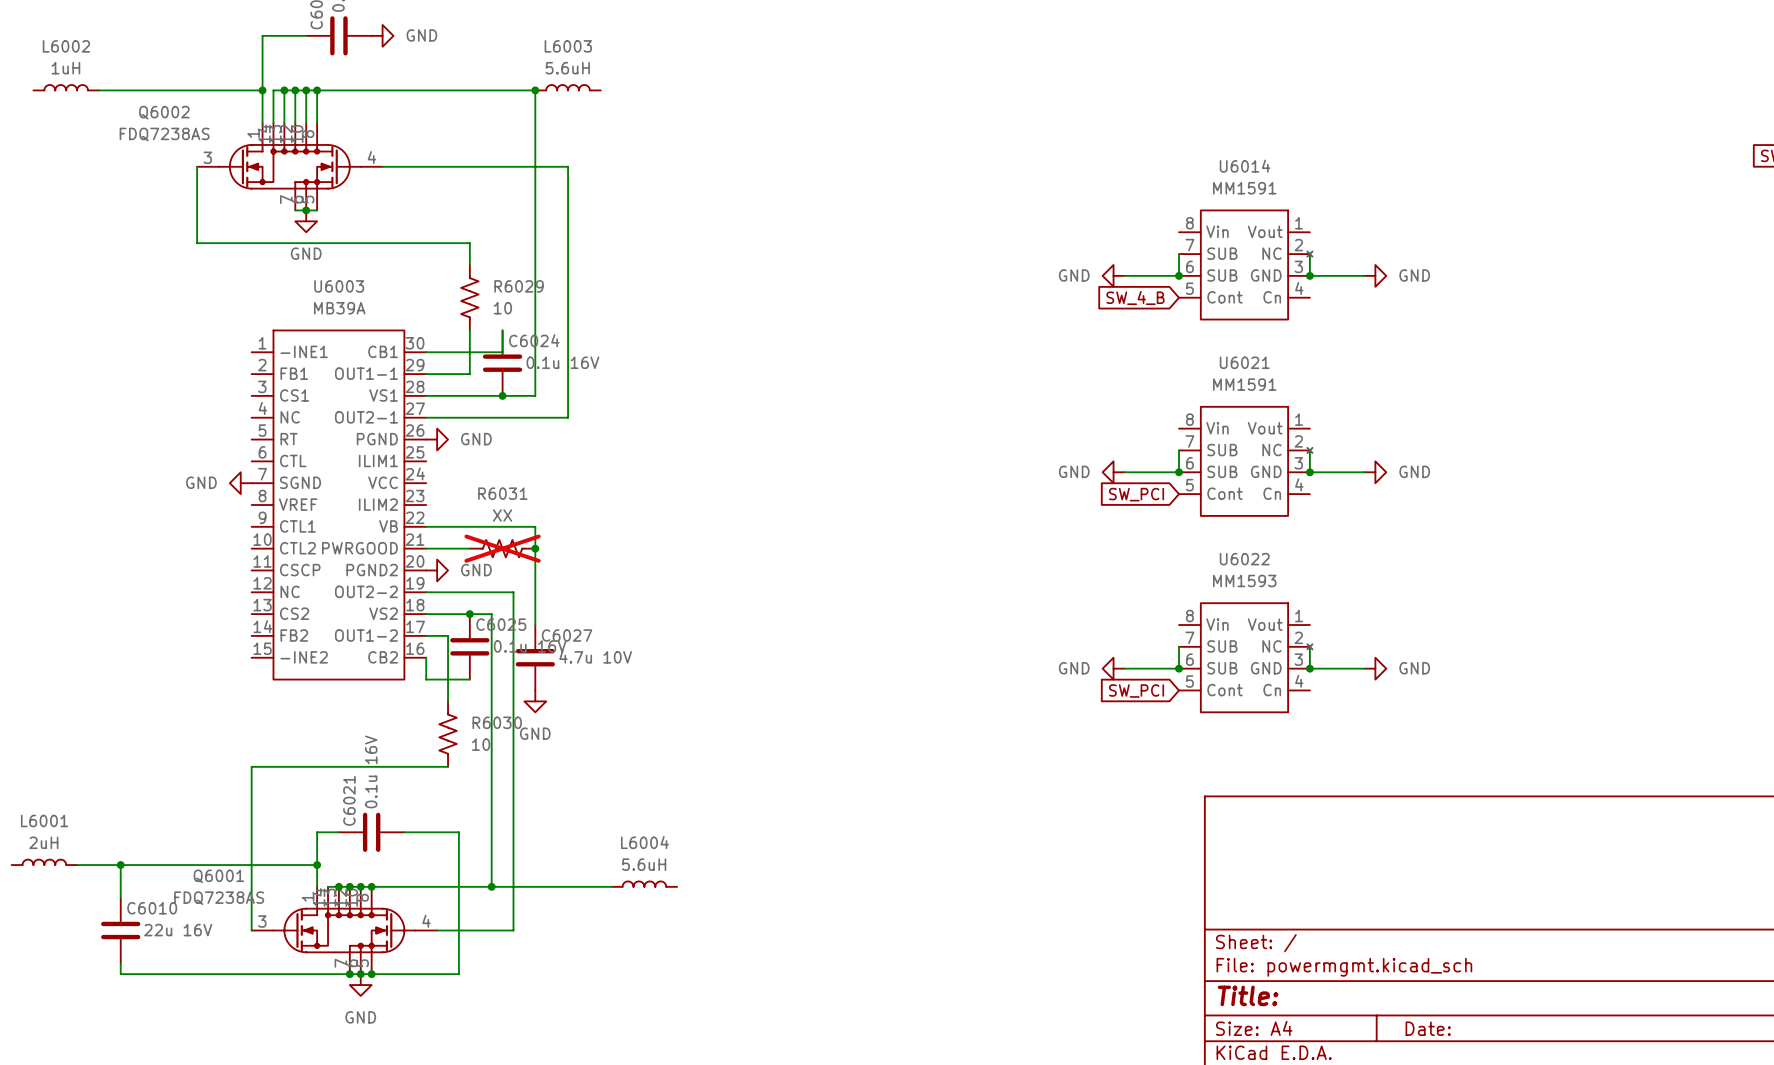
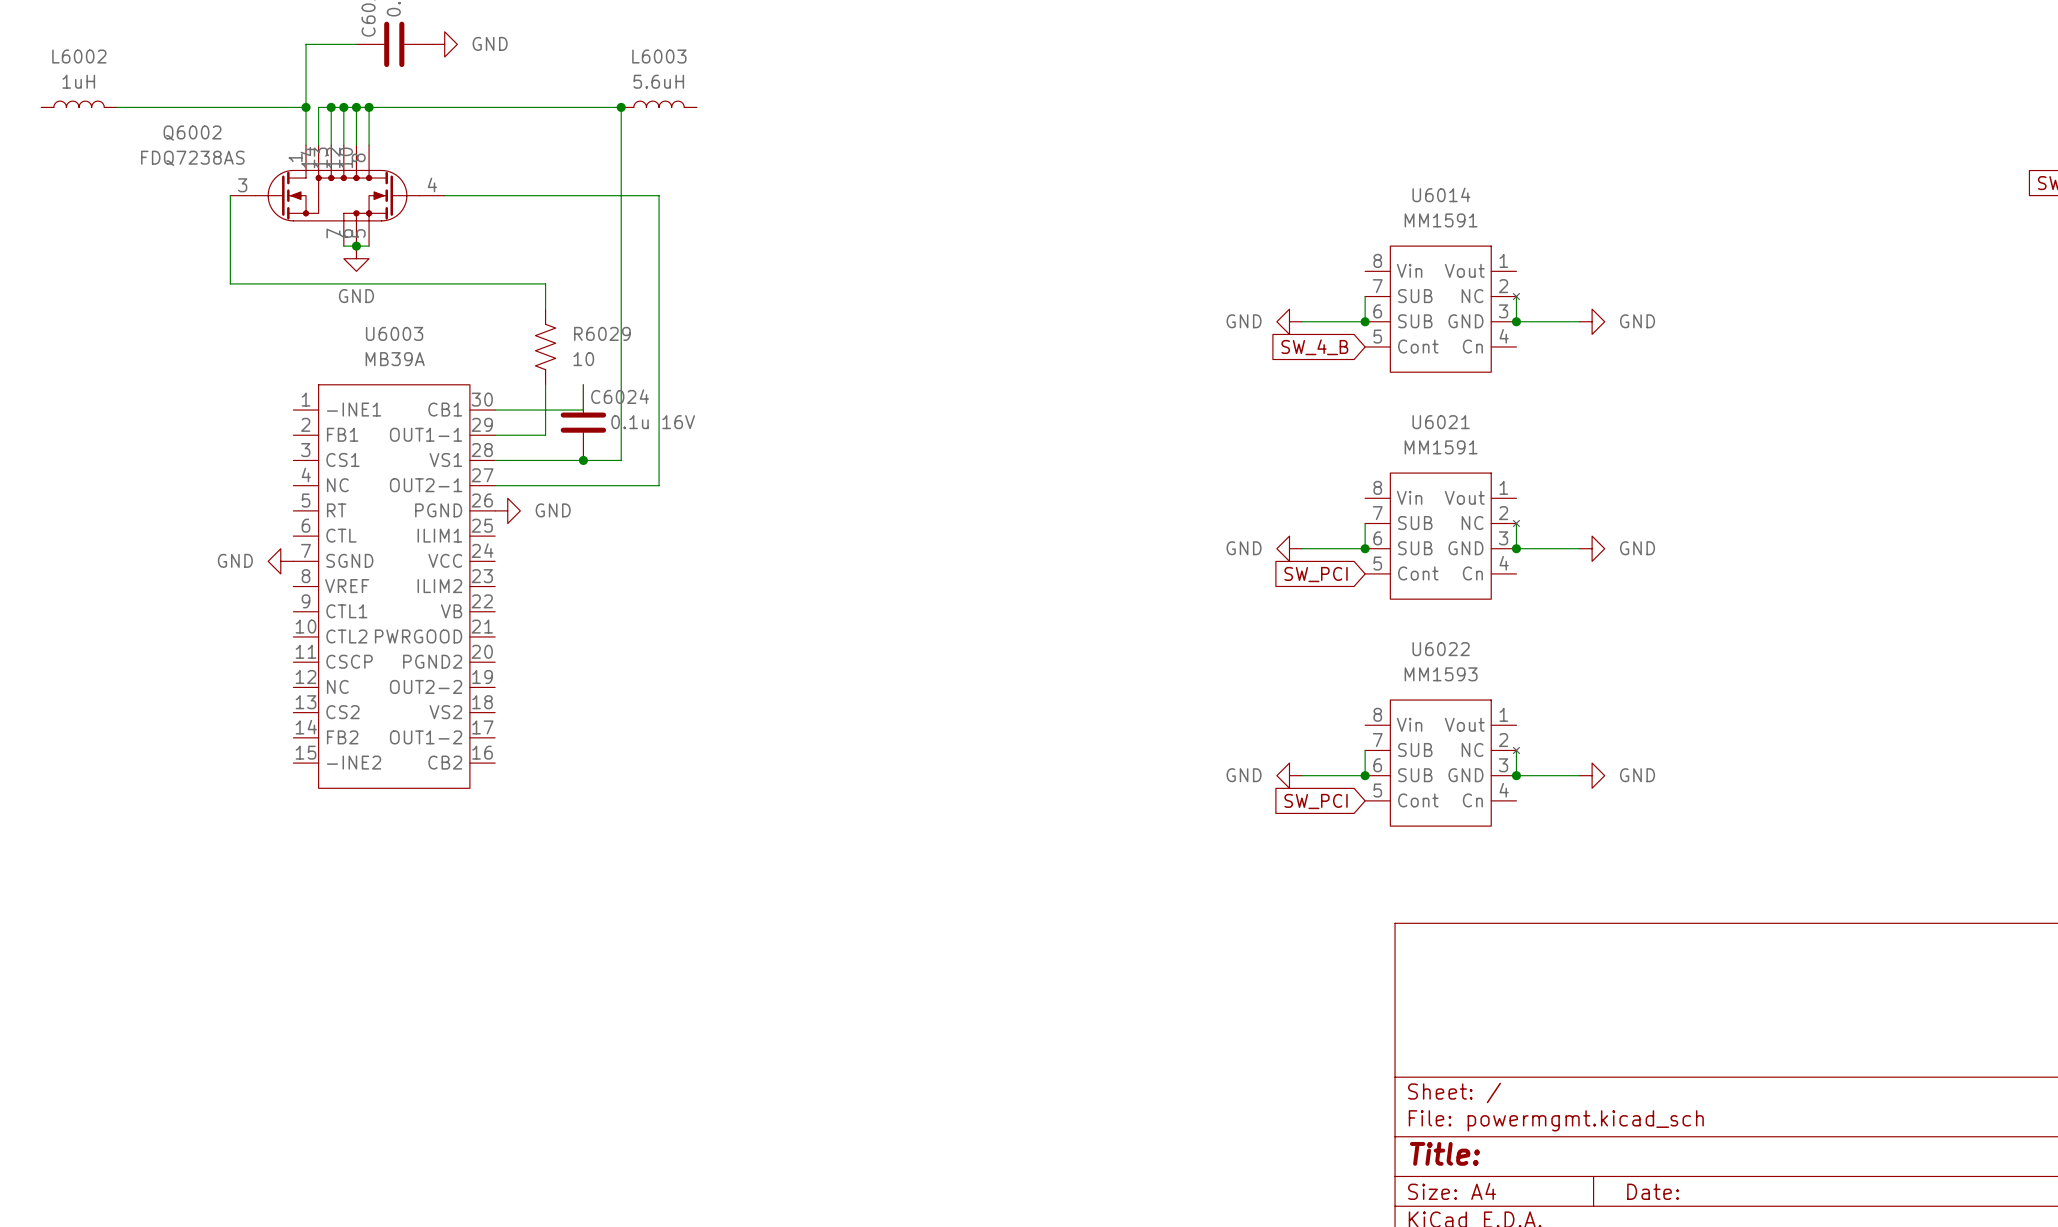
wire: (426, 526) (535, 526) (535, 625) -> none
wire: (426, 548) (469, 548) -> none
R6031: XX (502, 548) -> none
junction: (535, 548) -> none
power symbol: GND (437, 570) -> none
wire: (426, 592) (513, 592) (513, 930) (437, 930) -> none
wire: (426, 614) (491, 614) (491, 886) -> none
junction: (469, 614) -> none
wire: (426, 635) (448, 635) (448, 701) -> none
C6025: 0.1u 16V (469, 646) -> none
wire: (426, 657) (426, 679) (469, 679) -> none
C6027: 4.7u 10V (535, 657) -> none
power symbol: GND (535, 701) -> none
R6030: 10 (448, 734) -> none
wire: (448, 766) (251, 766) (251, 930) -> none
wire: (338, 832) (317, 832) (317, 886) -> none
C6021: 0.1u 16V (371, 832) -> none
wire: (404, 832) (458, 832) (458, 974) (120, 974) (120, 963) -> none
L6001: 2uH (44, 862) -> none
wire: (77, 865) (317, 865) -> none
wire: (120, 865) (120, 897) -> none
junction: (120, 865) -> none
junction: (317, 865) -> none
L6004: 5.6uH (644, 884) -> none
wire: (328, 886) (611, 886) -> none
junction: (338, 886) -> none
junction: (349, 886) -> none
junction: (360, 886) -> none
junction: (371, 886) -> none
junction: (491, 886) -> none
C6010: 22u 16V (120, 930) -> none
Q6001: FDQ7238AS (344, 930) -> none
junction: (349, 974) -> none
junction: (360, 974) -> none
junction: (371, 974) -> none
power symbol: GND (360, 985) -> none

